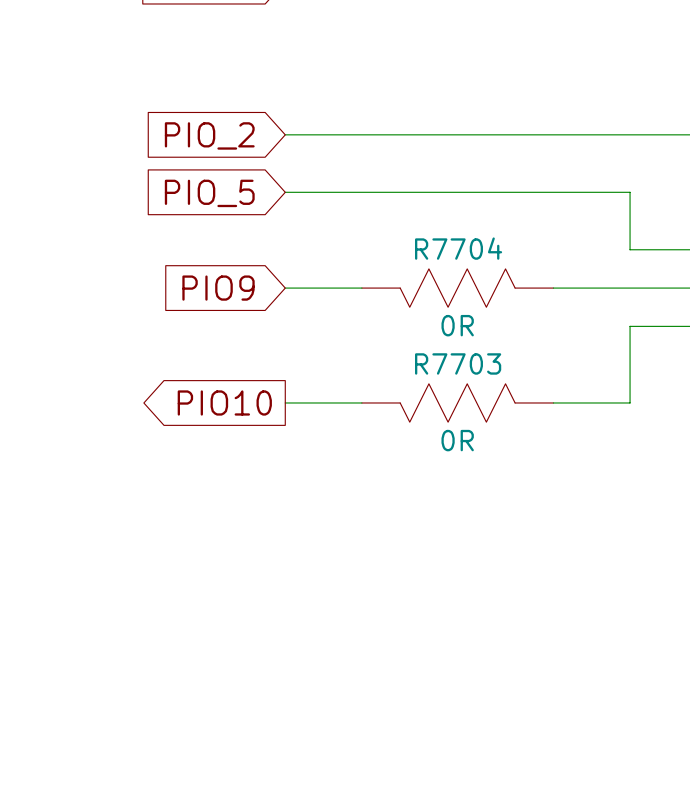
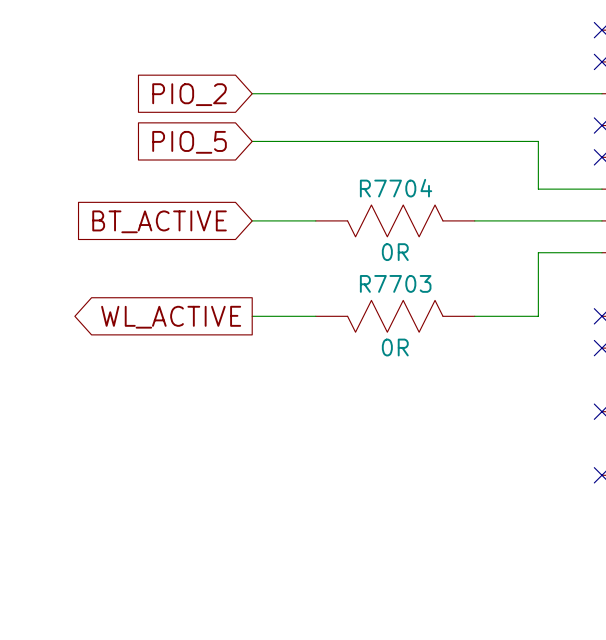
global label: PIO9 (218, 288) -> BT_ACTIVE (159, 221)
global label: PIO10 (224, 402) -> WL_ACTIVE (171, 317)

